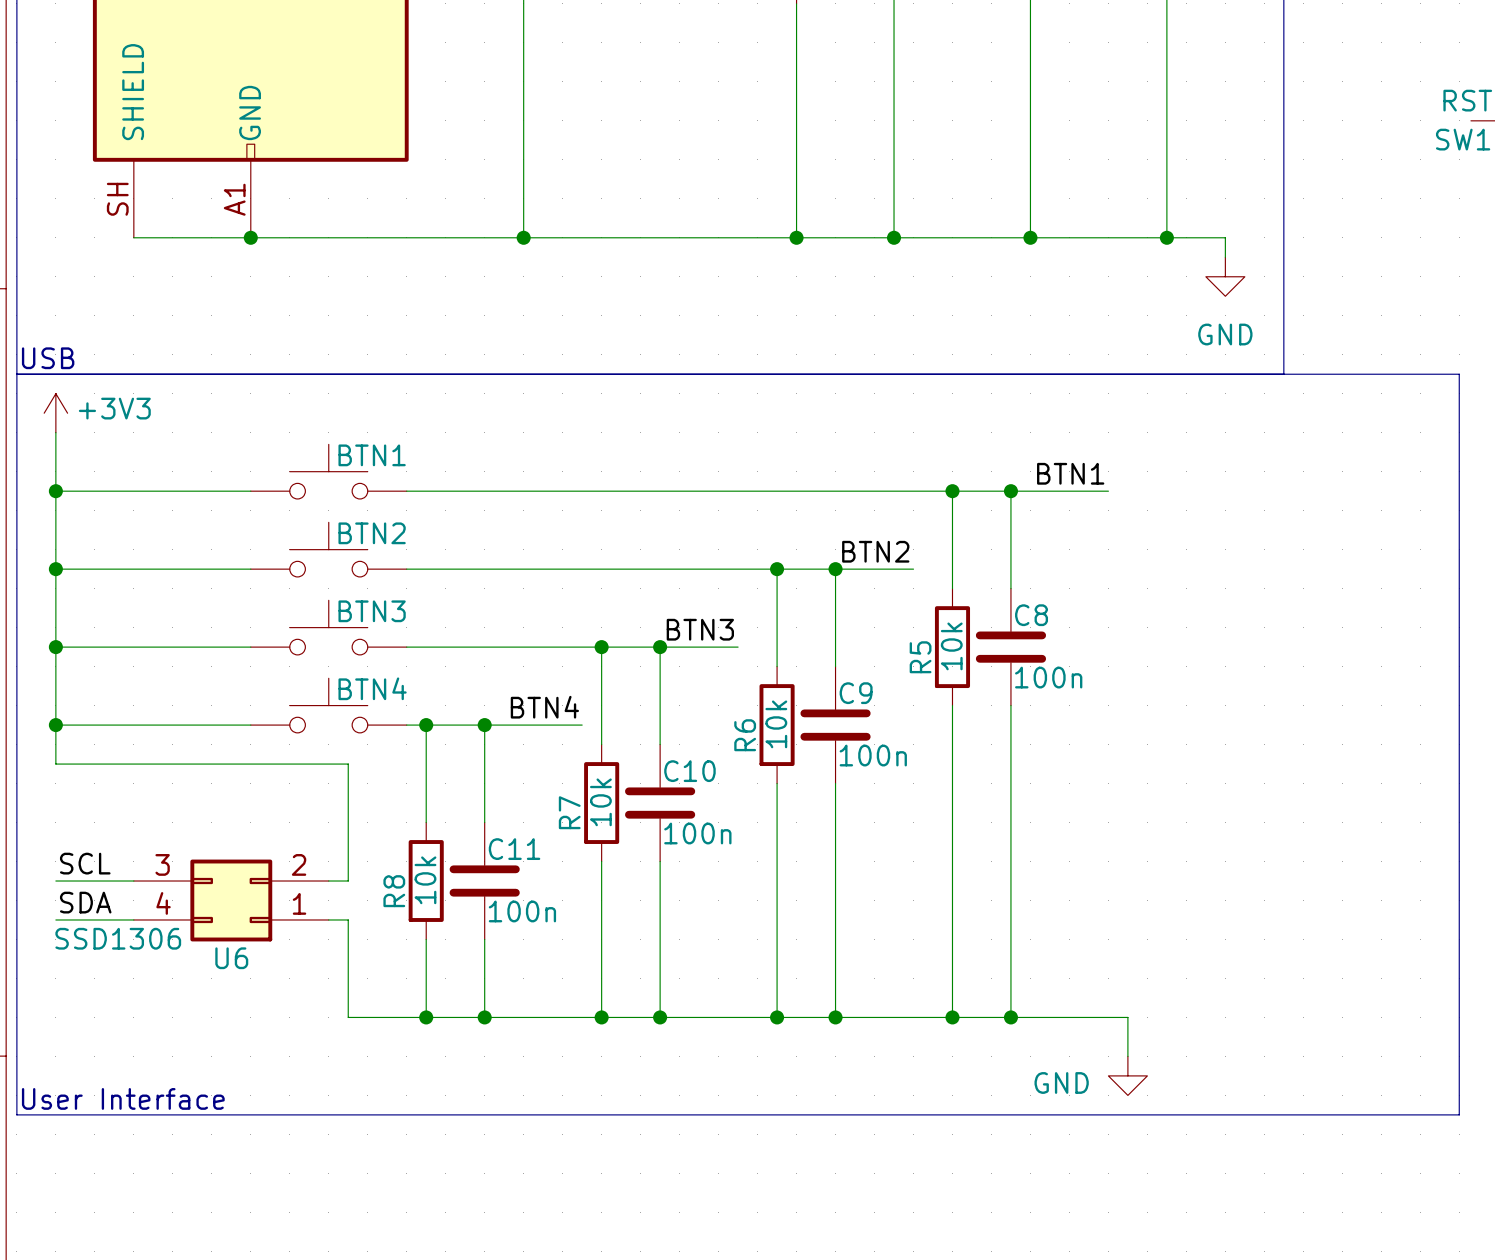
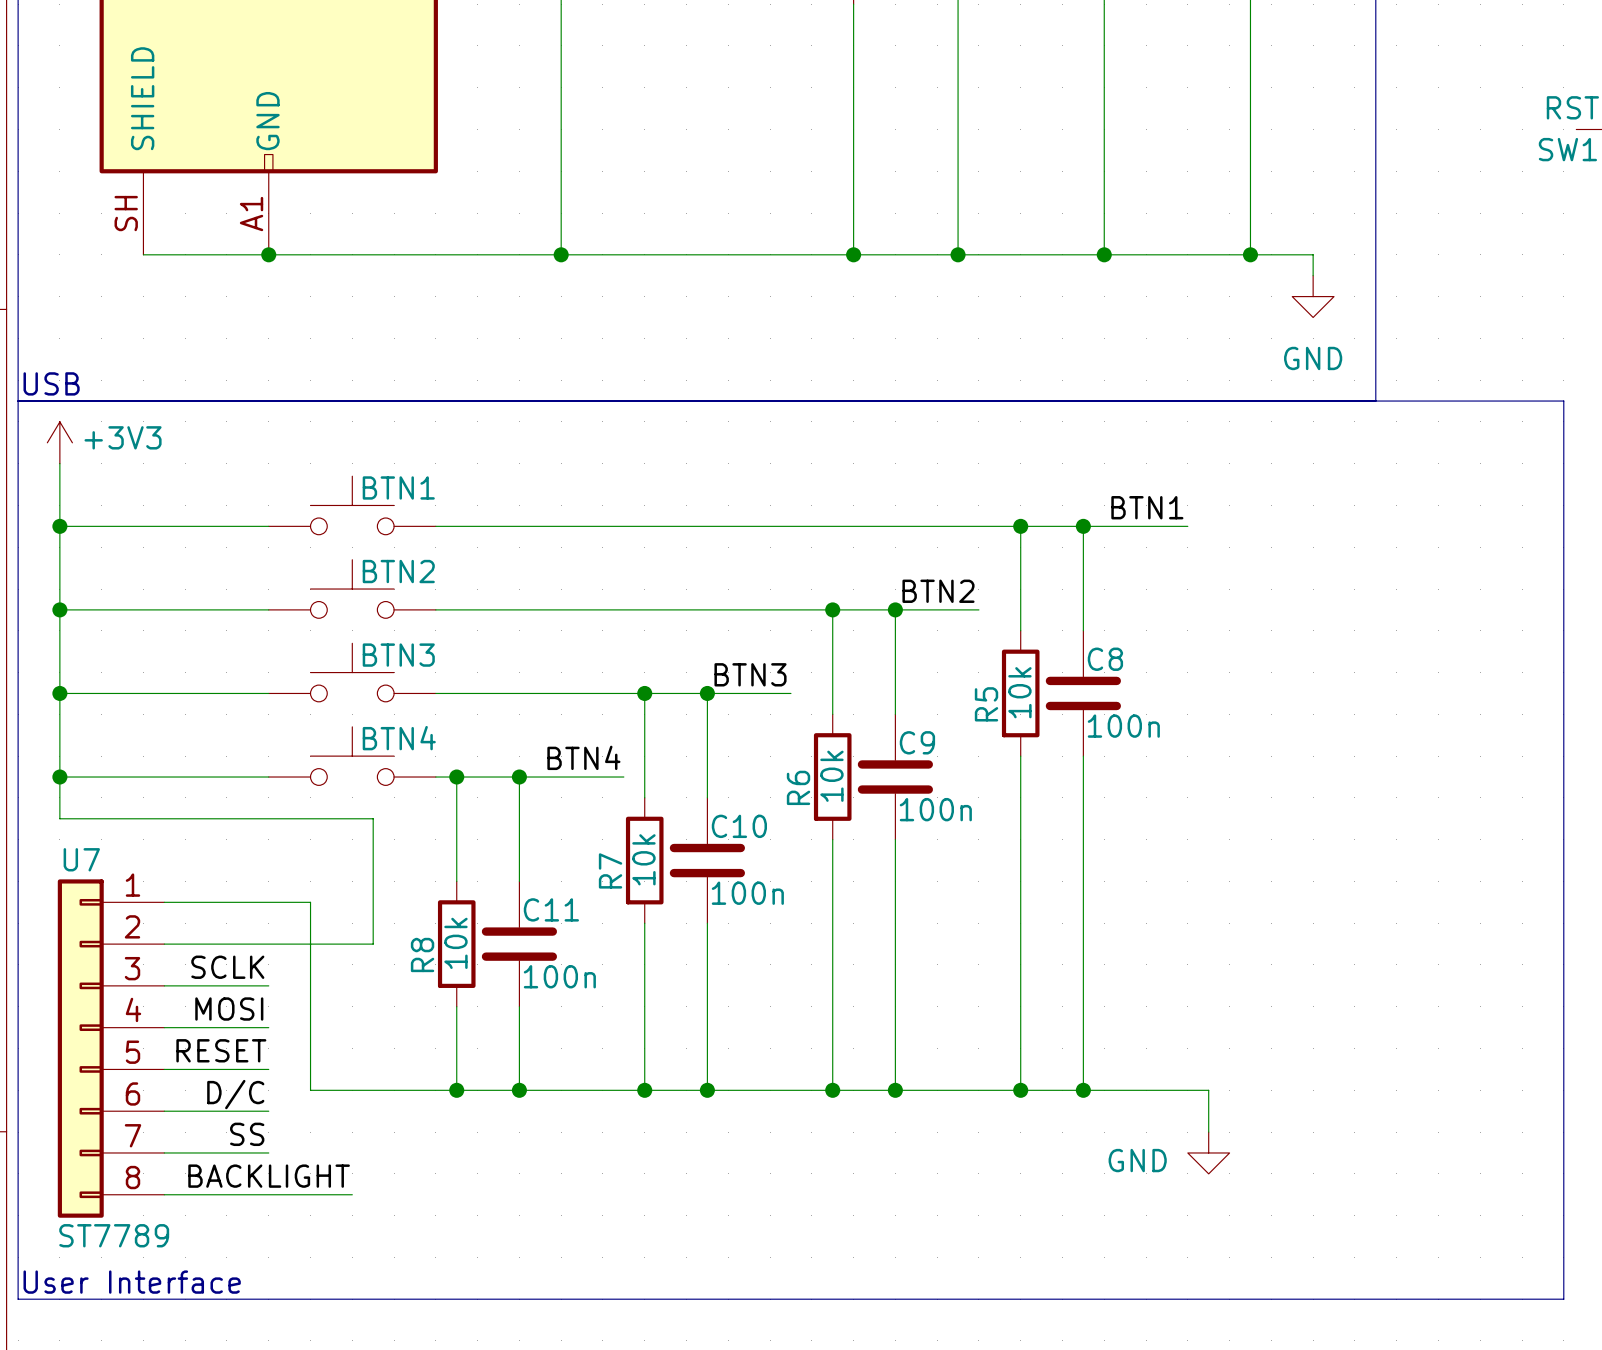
label: SCL (85, 863) -> none
U6: SSD1306 (231, 900) -> none
label: SDA (85, 902) -> none
label: none -> SCLK (227, 967)
wire: (328, 919) (348, 919) (348, 1017) -> (164, 902) (310, 902) (310, 1090) (373, 1090)
label: none -> MOSI (229, 1009)
wire: none -> (164, 1027) (268, 1027)
U7: none -> ST7789 (111, 1048)
label: none -> RESET (221, 1050)
wire: none -> (164, 1069) (268, 1069)
label: none -> D/C (235, 1094)
wire: none -> (164, 1111) (268, 1111)
label: none -> SS (247, 1134)
wire: none -> (164, 1152) (268, 1152)
label: none -> BACKLIGHT (269, 1176)
text position: User Interface (123, 1098) -> User Interface (132, 1282)
line: (16, 1114) (1459, 1114) -> (18, 1194) (18, 1299) (1563, 1299) (1563, 1194)

